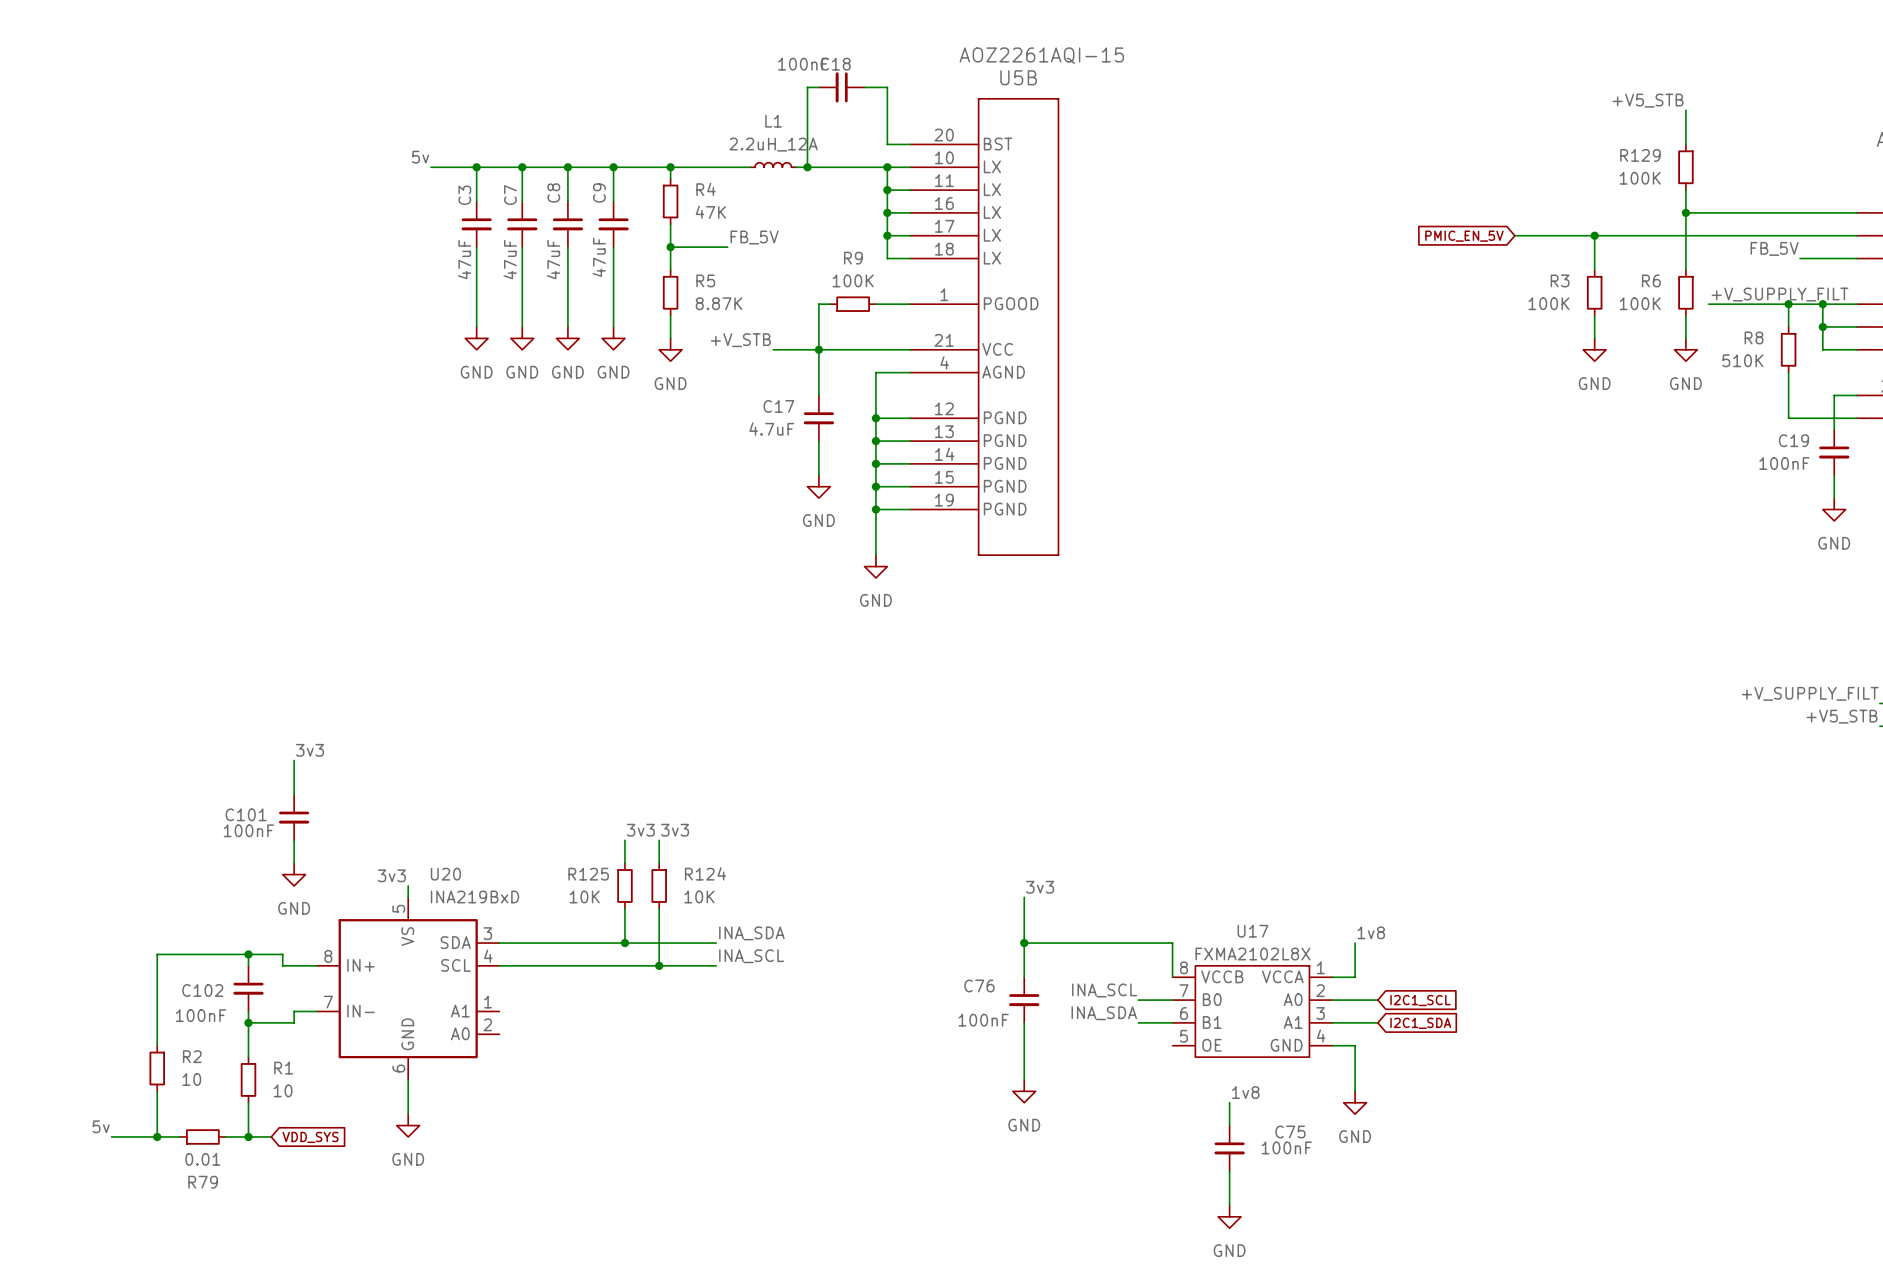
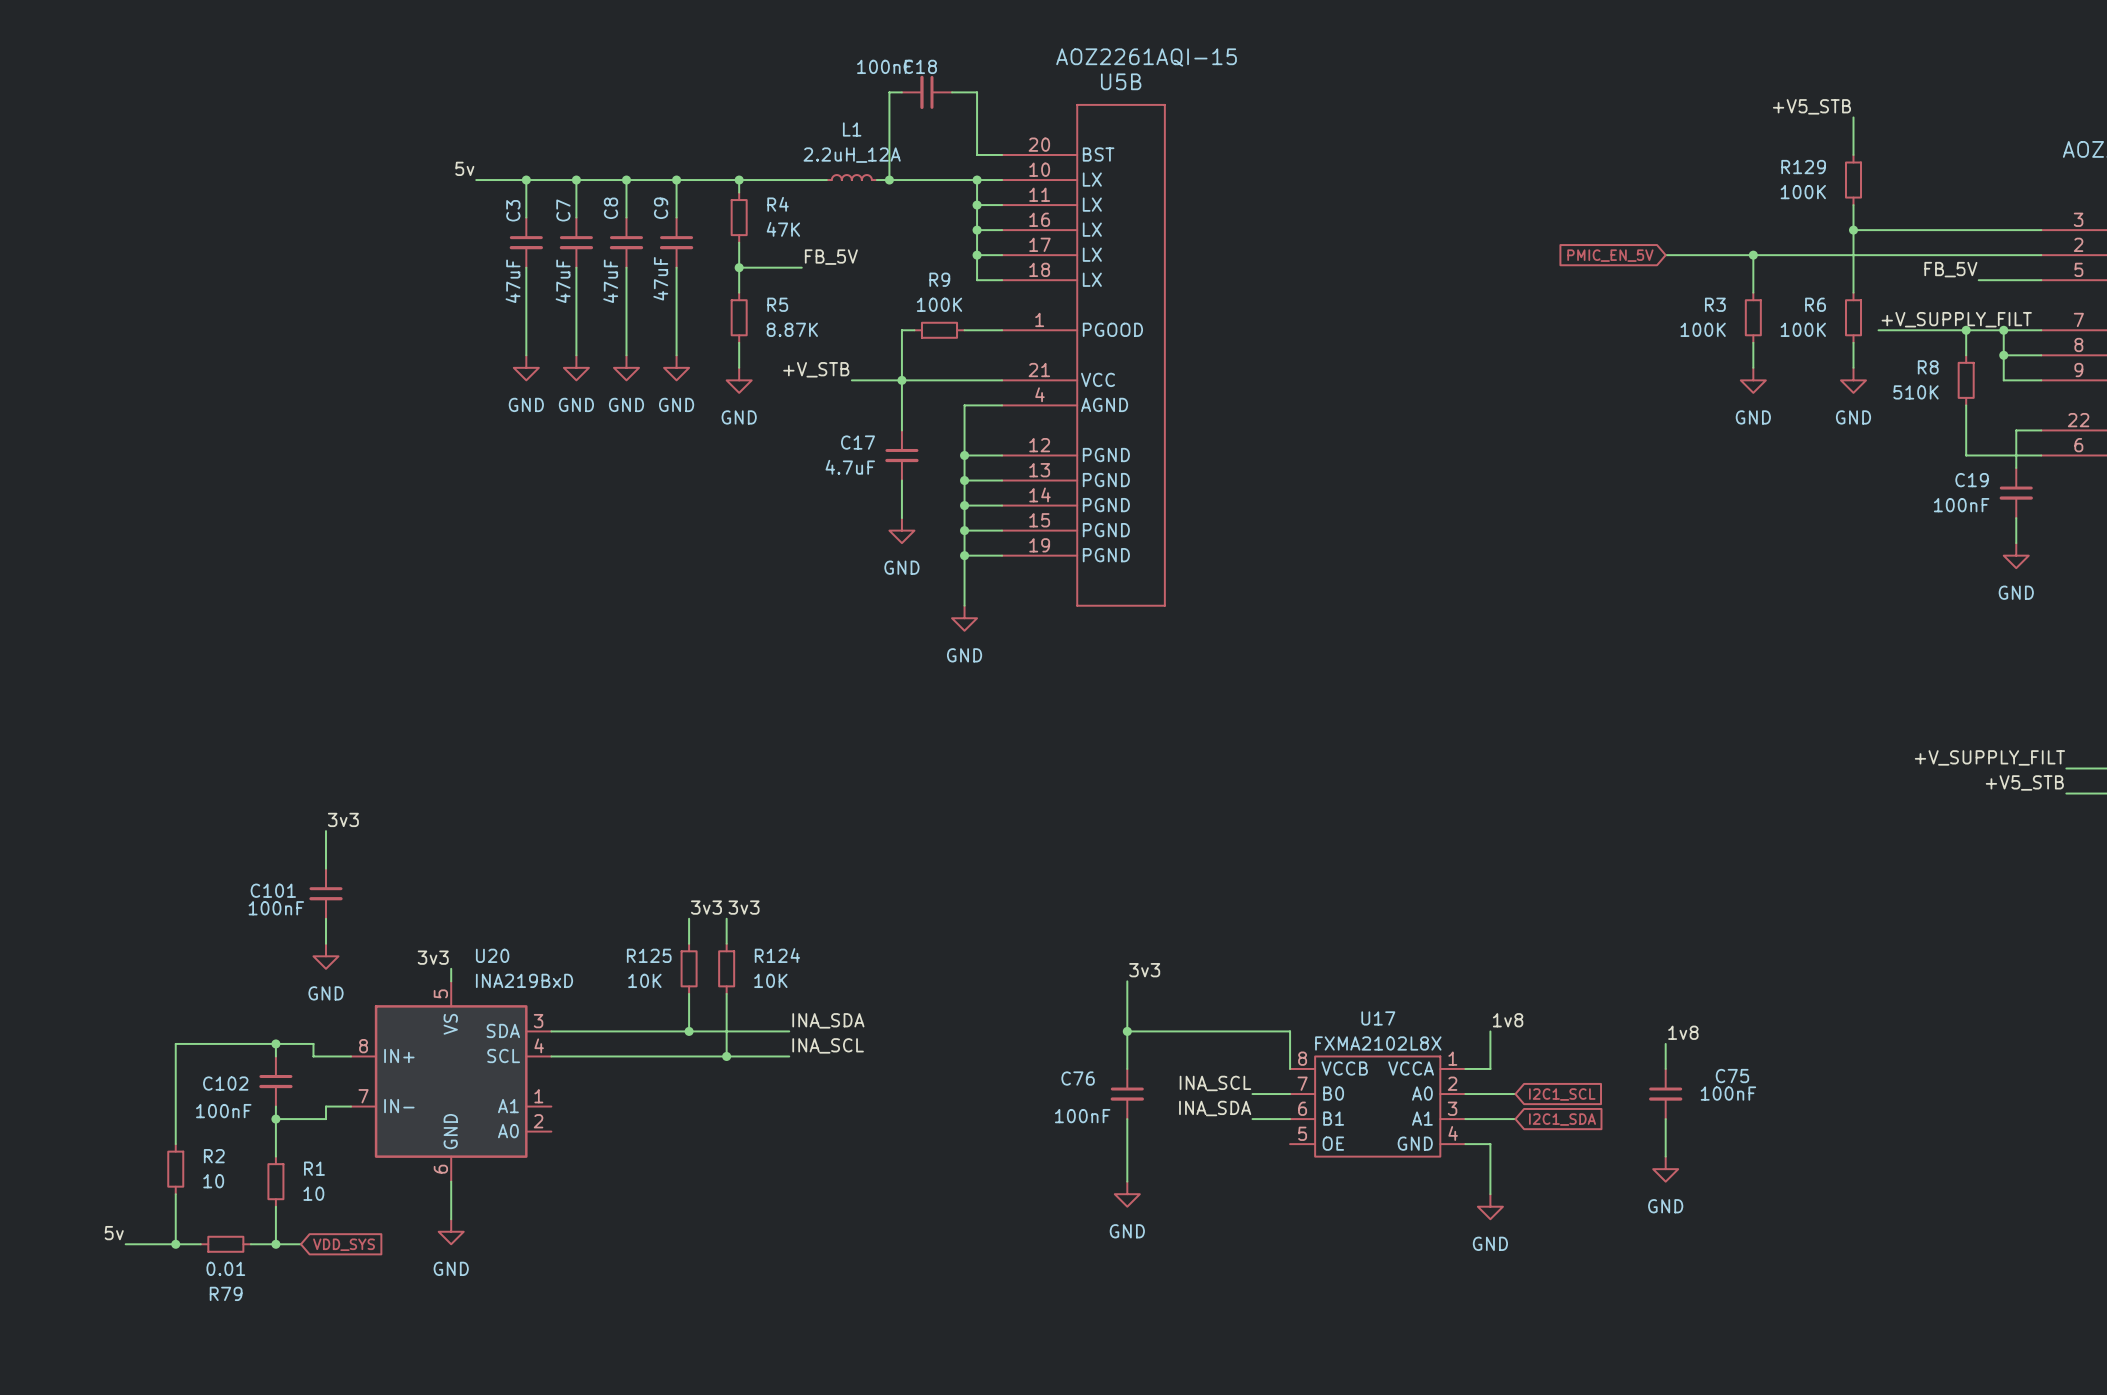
label: none -> 1v8 (1683, 1032)
wire: none -> (1665, 1043) (1665, 1068)
wire: none -> (1665, 1119) (1665, 1156)
power symbol: none -> GND (1665, 1169)
label: 1v8 (1245, 1092) -> none
wire: (1229, 1102) (1229, 1125) -> none
C75 position: (1229, 1148) -> (1665, 1094)
wire: (1229, 1171) (1229, 1205) -> none
power symbol: GND (1229, 1216) -> none

